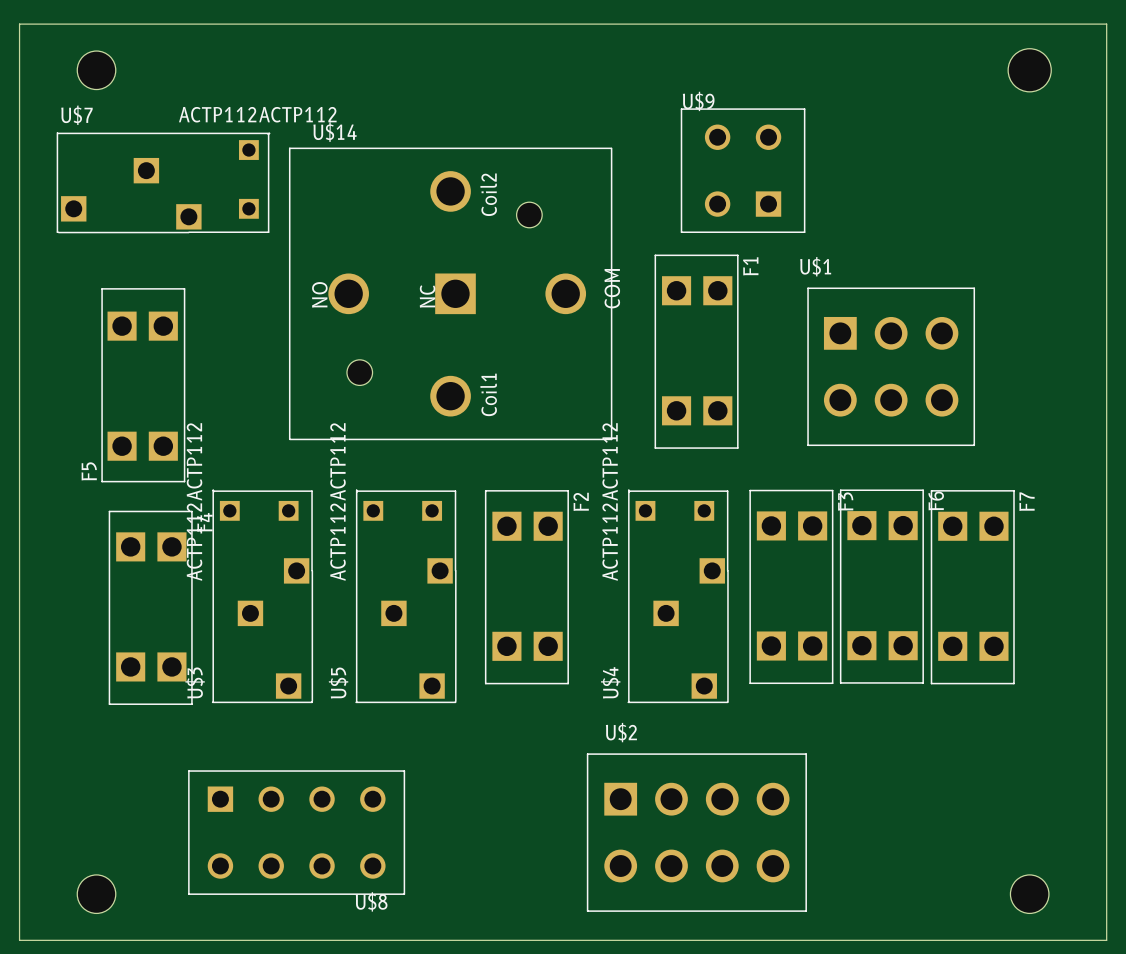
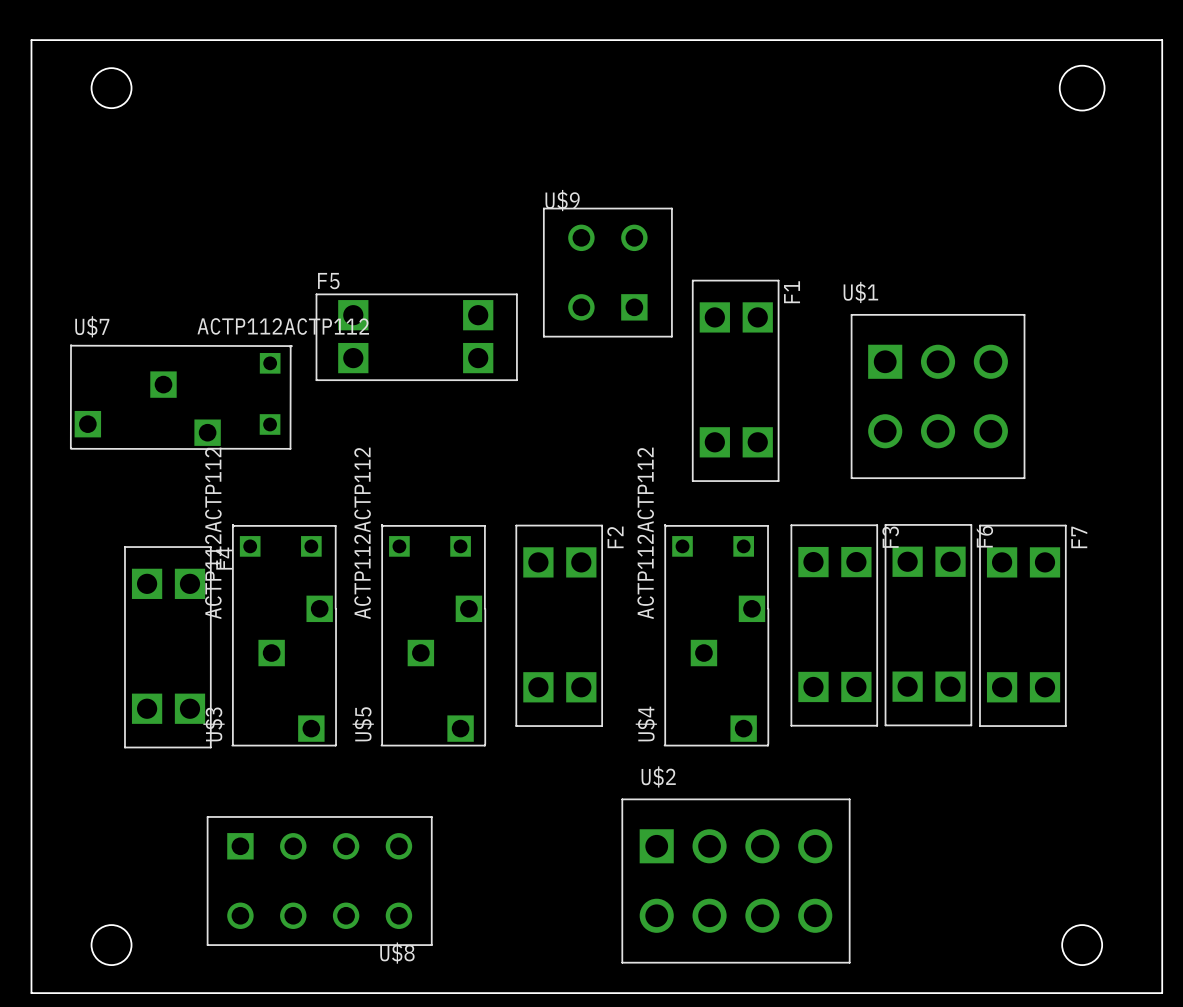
U$7 value rotation: 0° (257, 114) -> 0.1° clockwise (283, 326)
U$7 name rotation: 0° (76, 115) -> 0.1° clockwise (92, 326)
U$9 position: (743, 170) -> (607, 272)
U$7 position: (163, 182) -> (181, 397)
U$14: (450, 293) -> none
F5 rotation: 0° (143, 385) -> 90° clockwise (416, 337)
F5 position: (143, 385) -> (416, 337)

